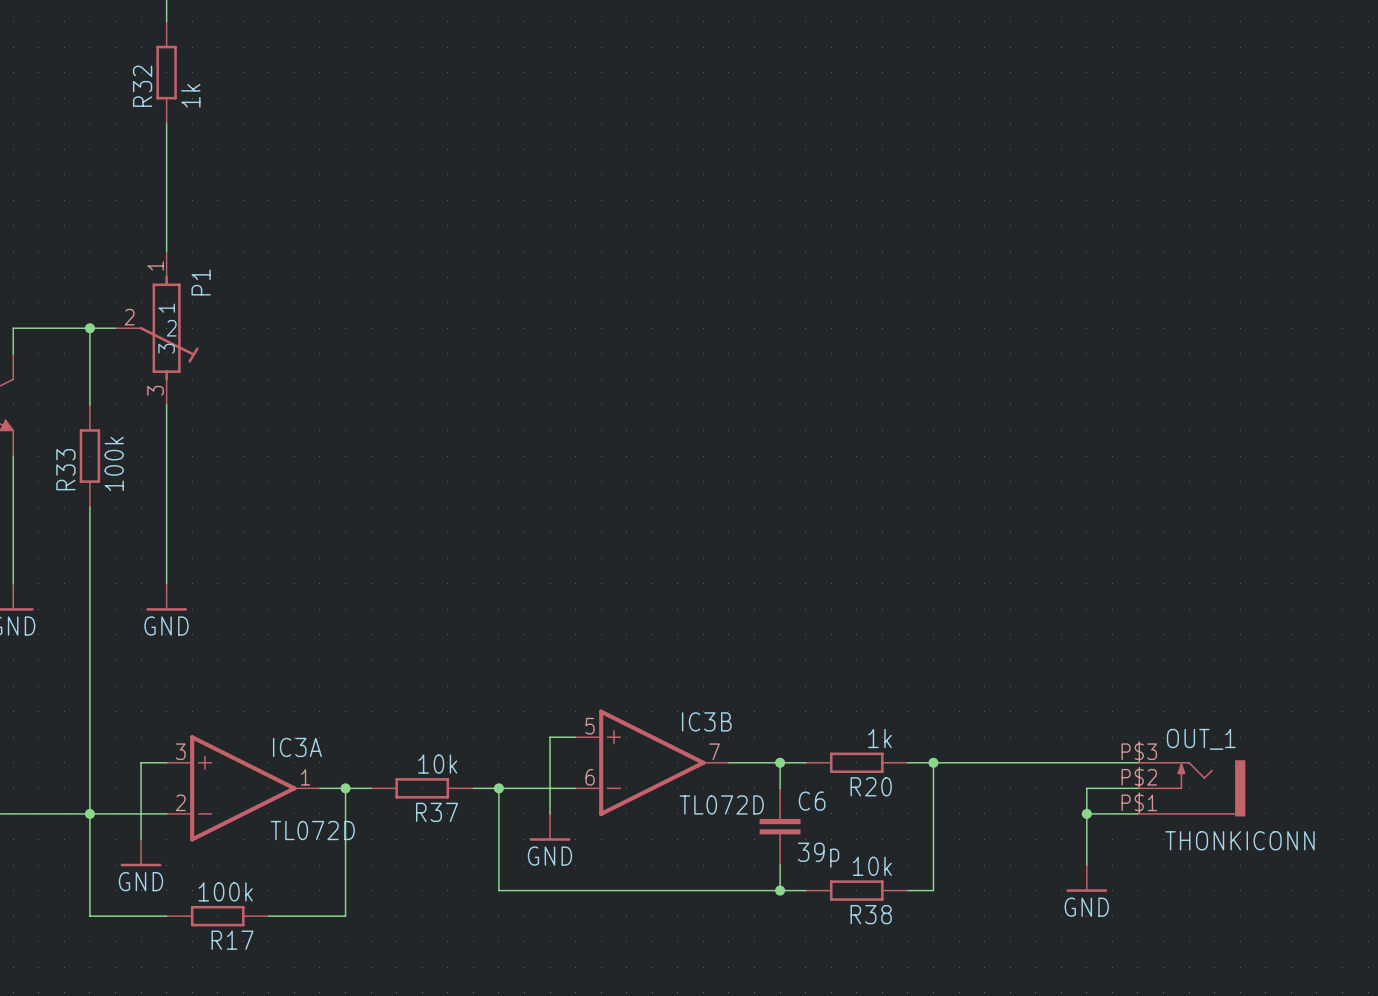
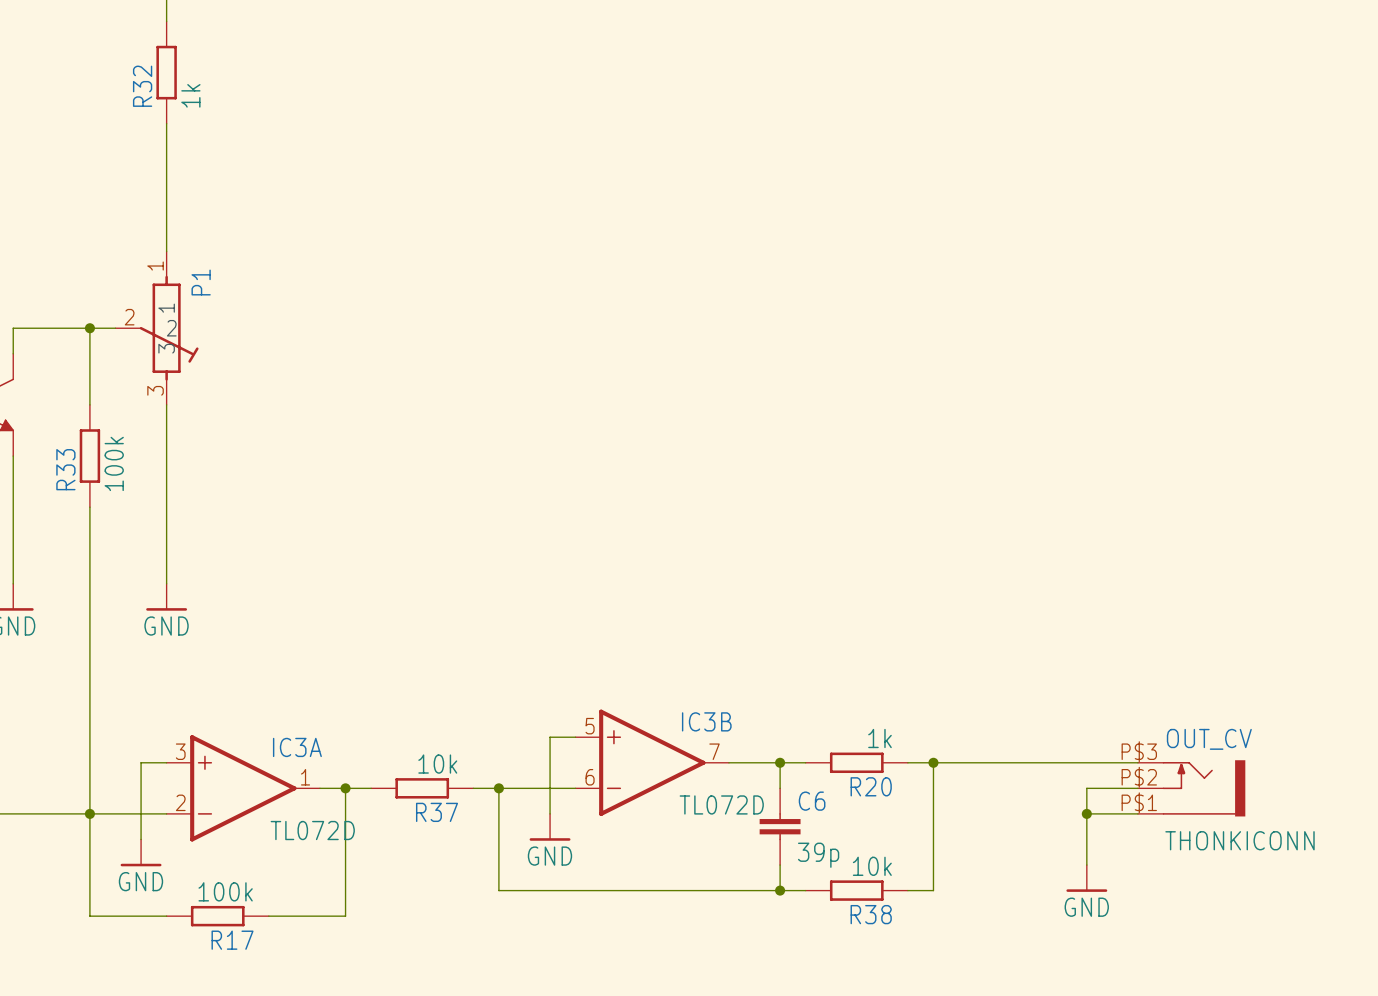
OUT_1 name: OUT_1 (1201, 739) -> OUT_CV (1209, 739)

